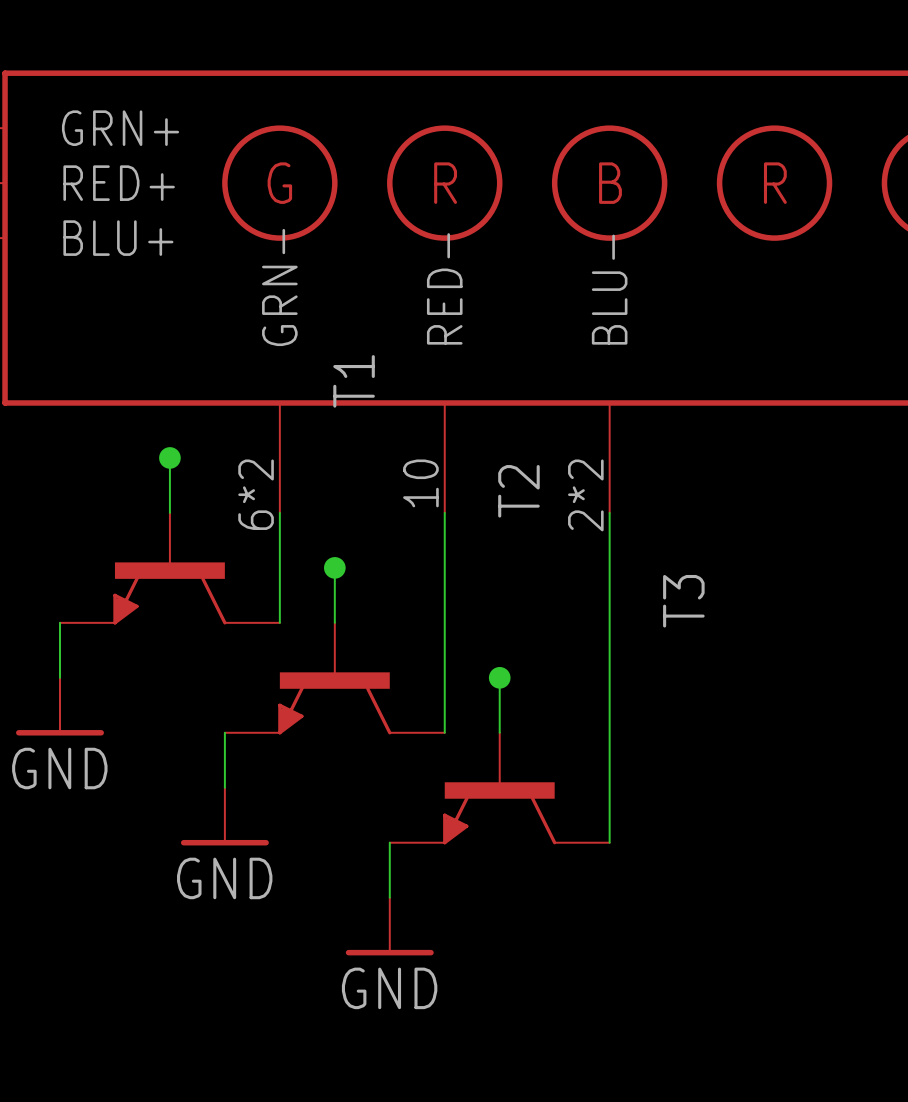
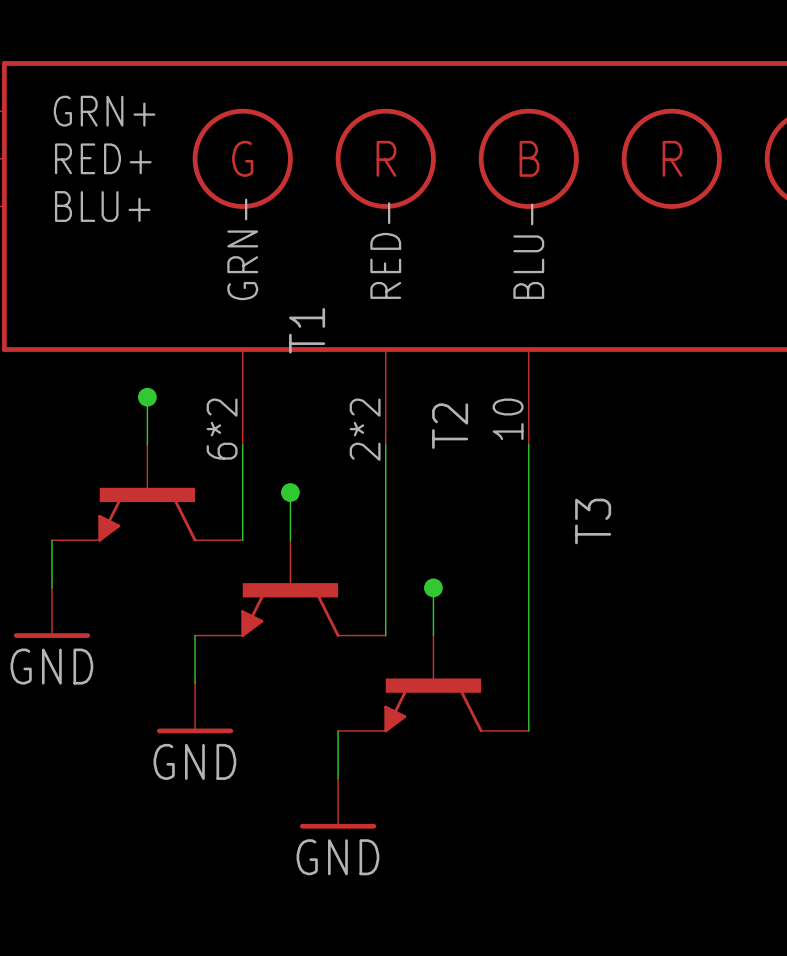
part pin number: 10 (420, 483) -> 2*2 (365, 429)
part pin number: 2*2 (585, 495) -> 10 (508, 419)

